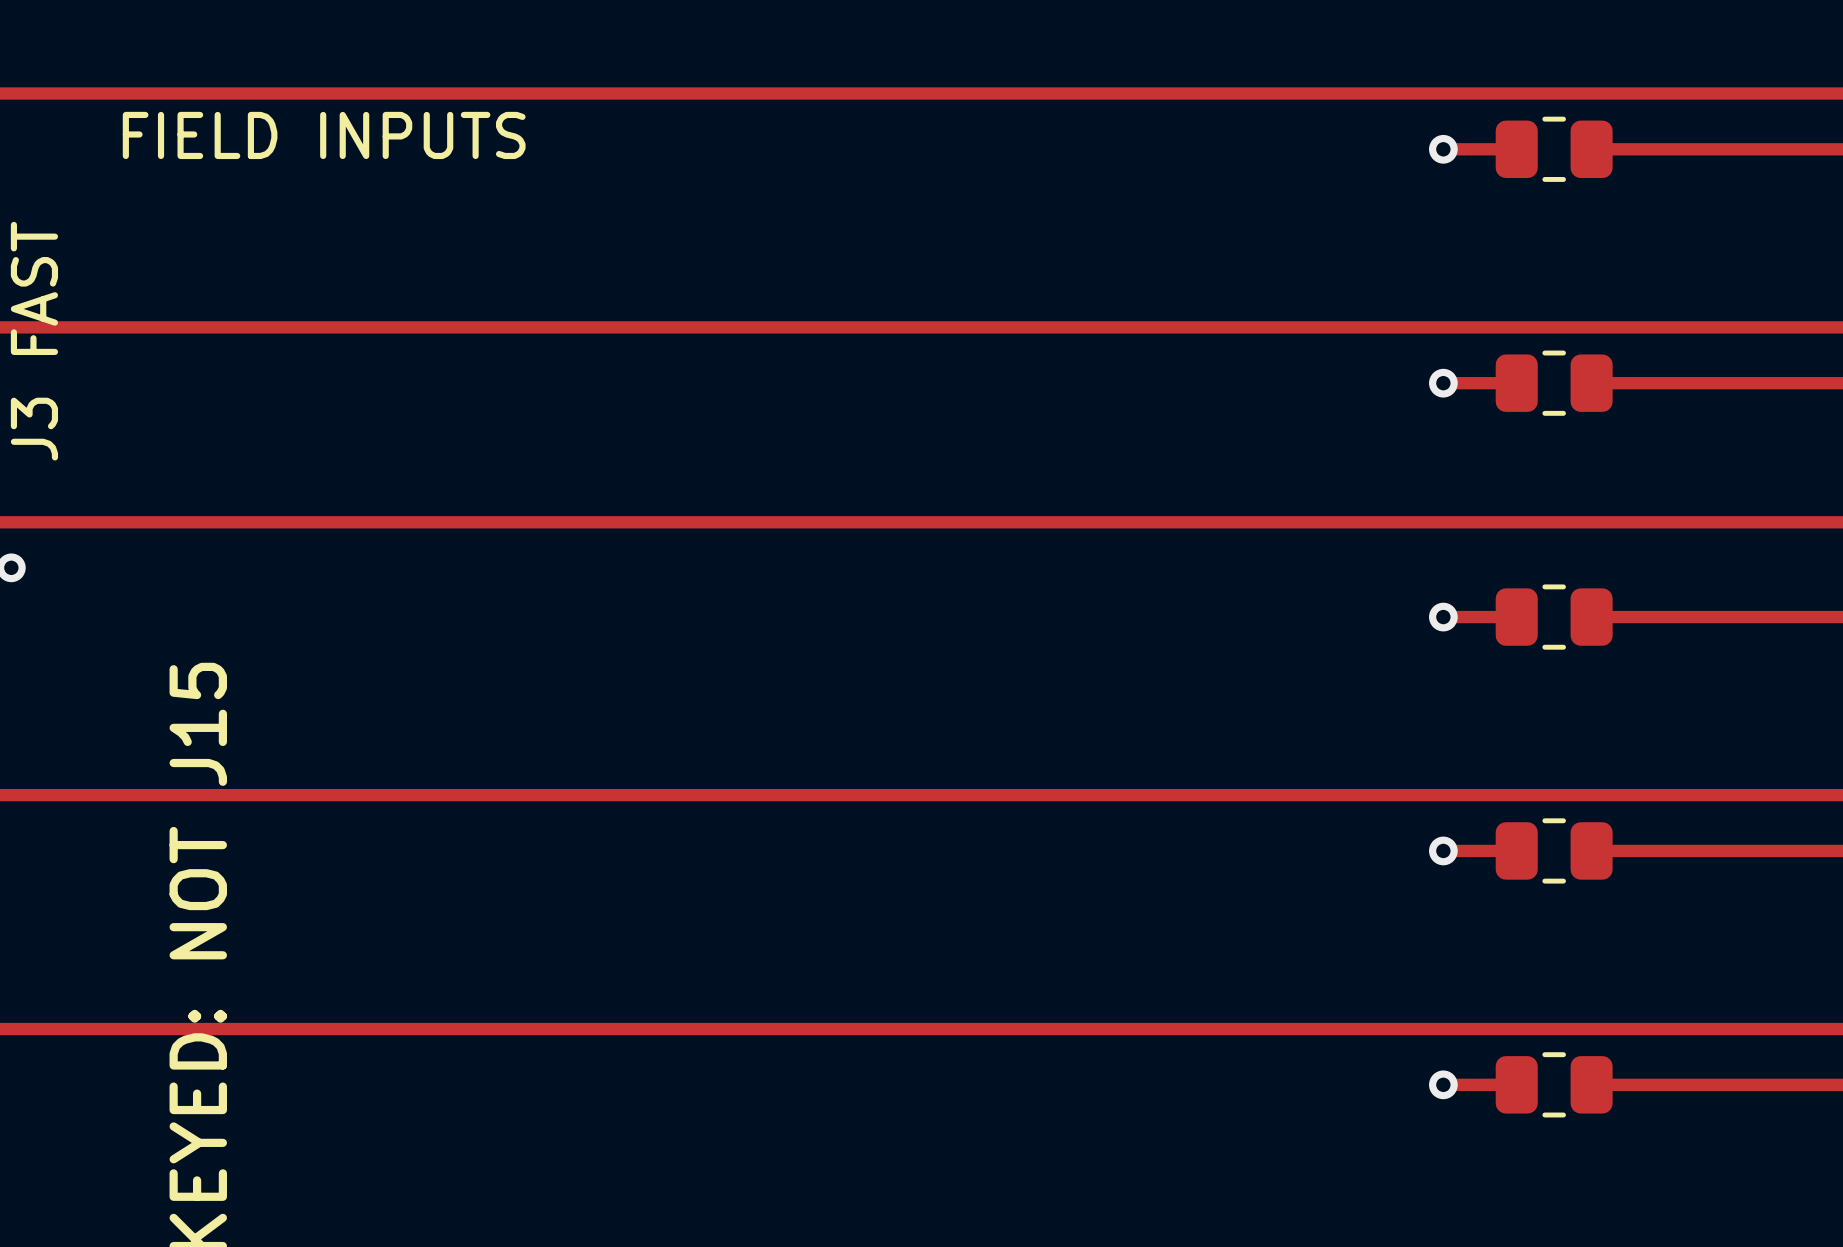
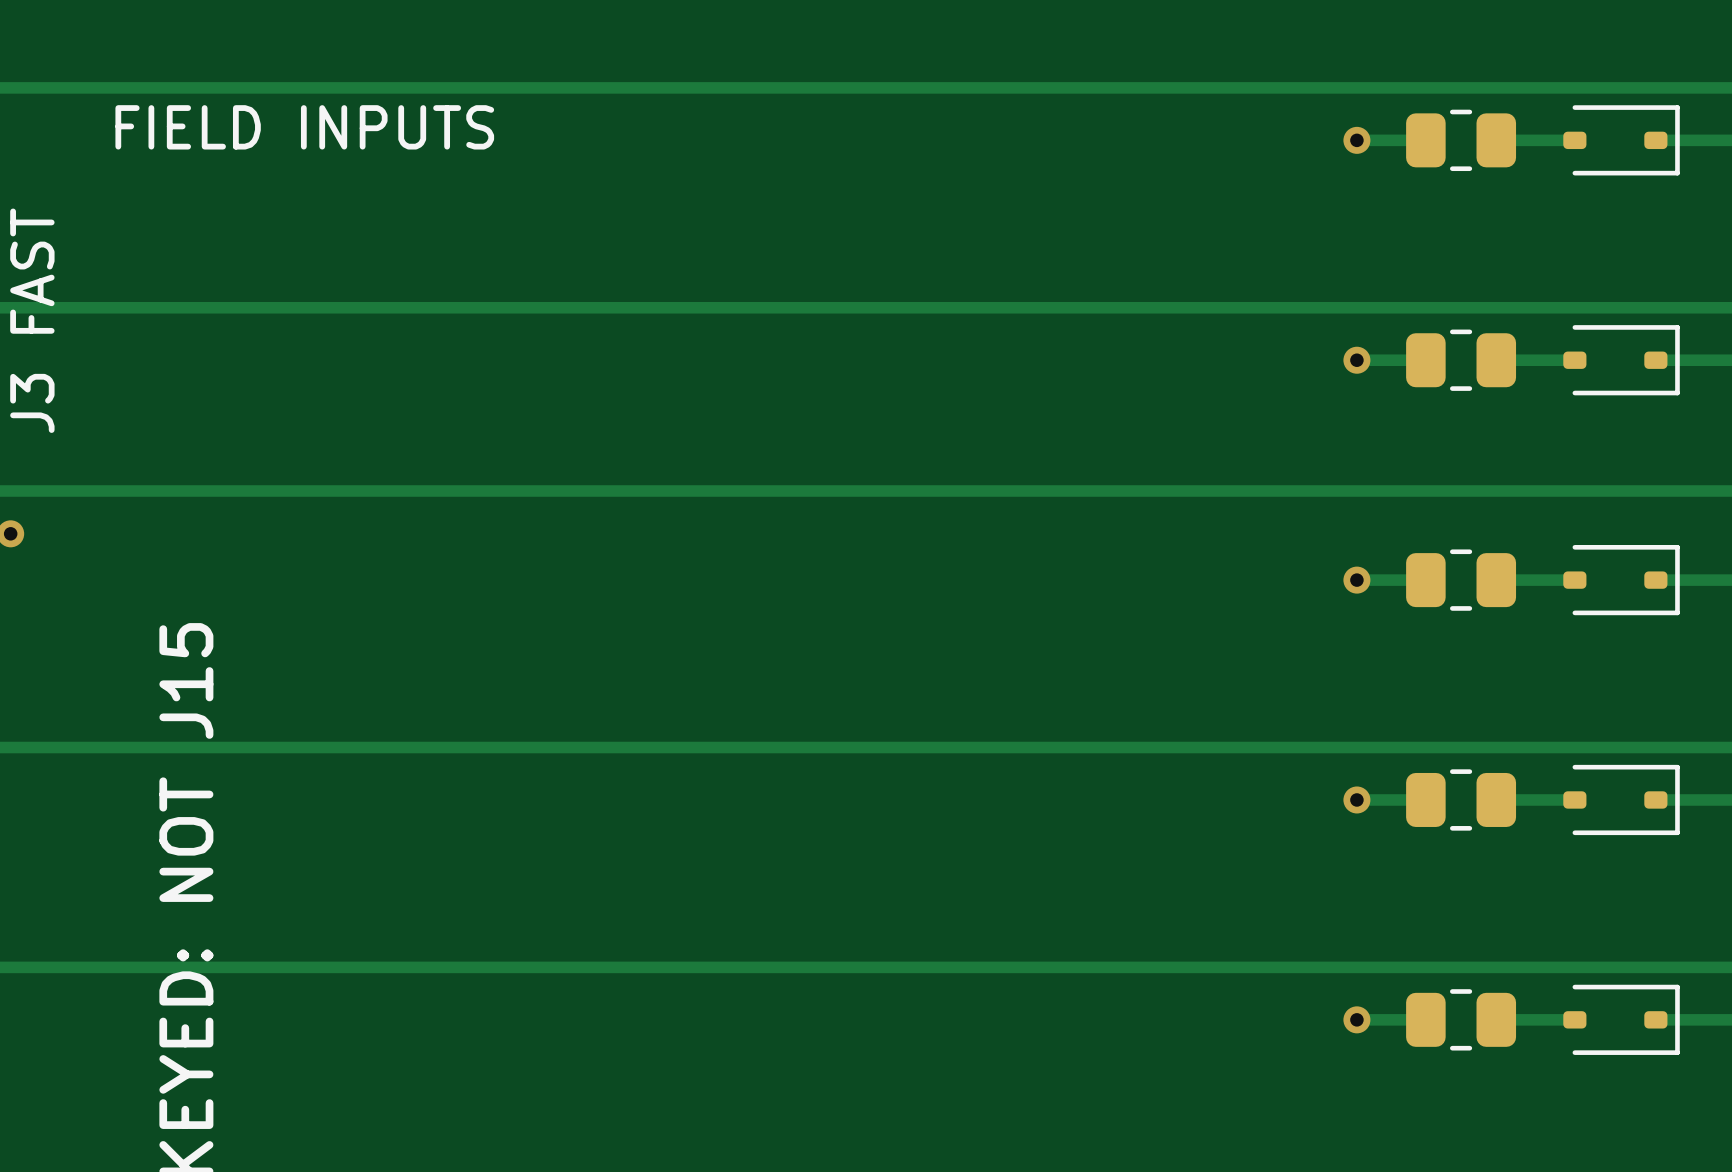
track: (1675, 149) (1761, 149) -> none
part: none -> (1621, 140)
track: (1675, 383) (1761, 383) -> none
part: none -> (1621, 360)
track: (1675, 617) (1761, 617) -> none
part: none -> (1621, 580)
track: (1675, 850) (1761, 850) -> none
part: none -> (1621, 799)
track: (1675, 1084) (1761, 1084) -> none
part: none -> (1621, 1019)

